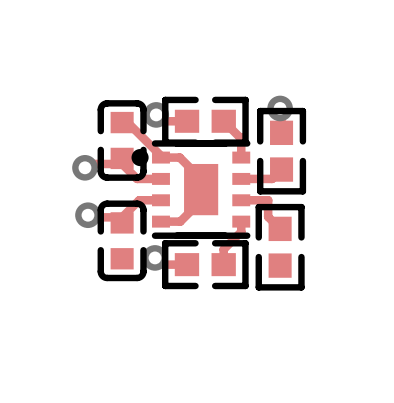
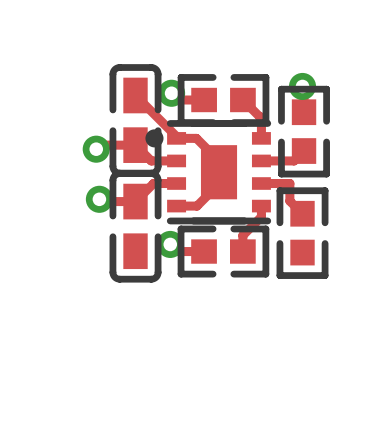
part footprint: [97, 100, 147, 181] -> [109, 64, 162, 177]
part footprint: [97, 200, 147, 282] -> [109, 170, 162, 283]

